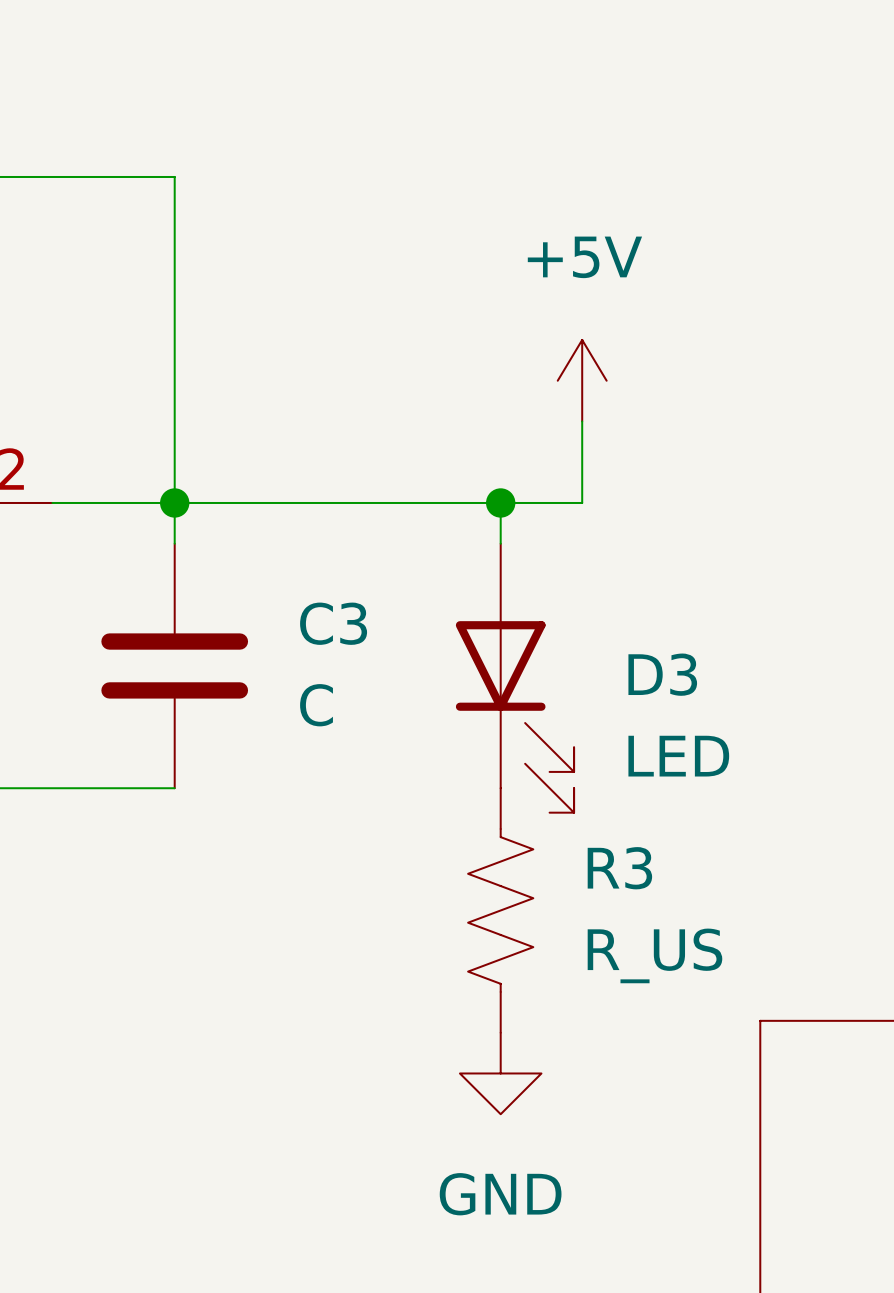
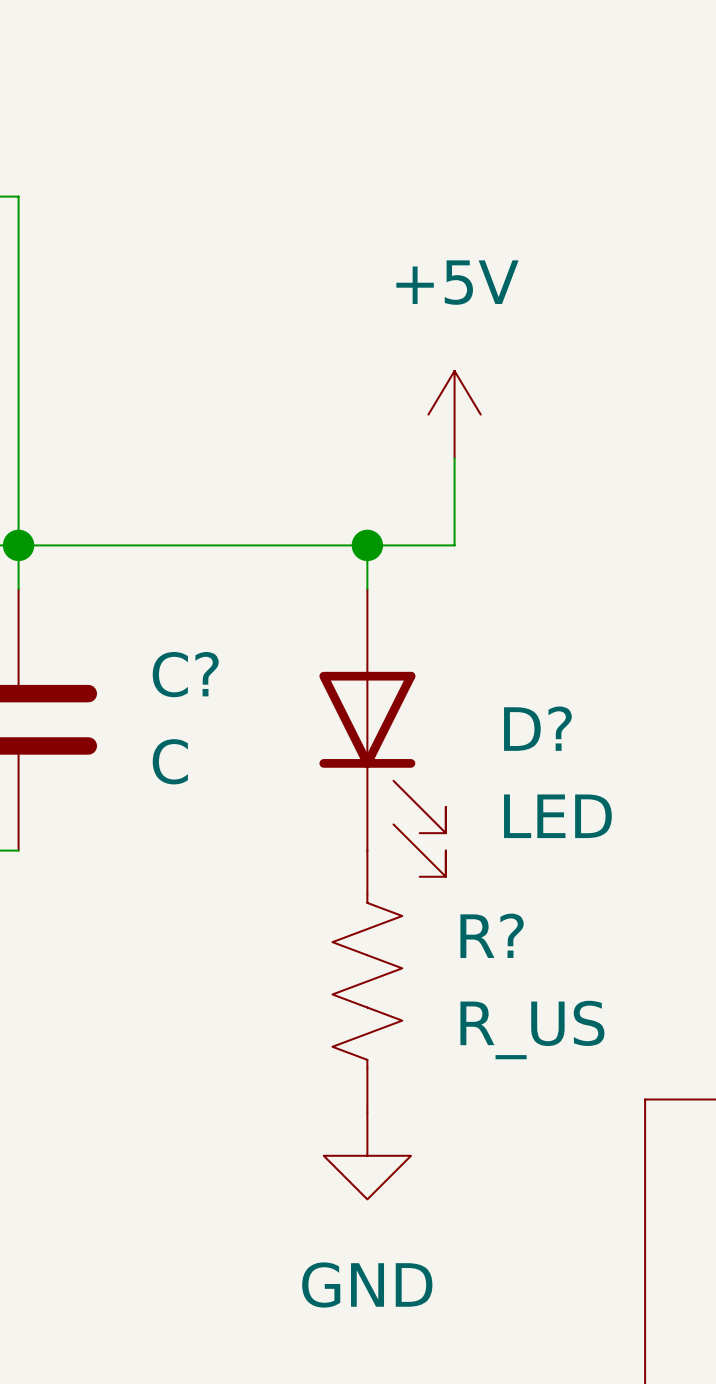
C3 name: C3 (333, 623) -> C? (185, 674)
D3 name: D3 (662, 674) -> D? (537, 728)
R3 name: R3 (619, 868) -> R? (492, 935)

